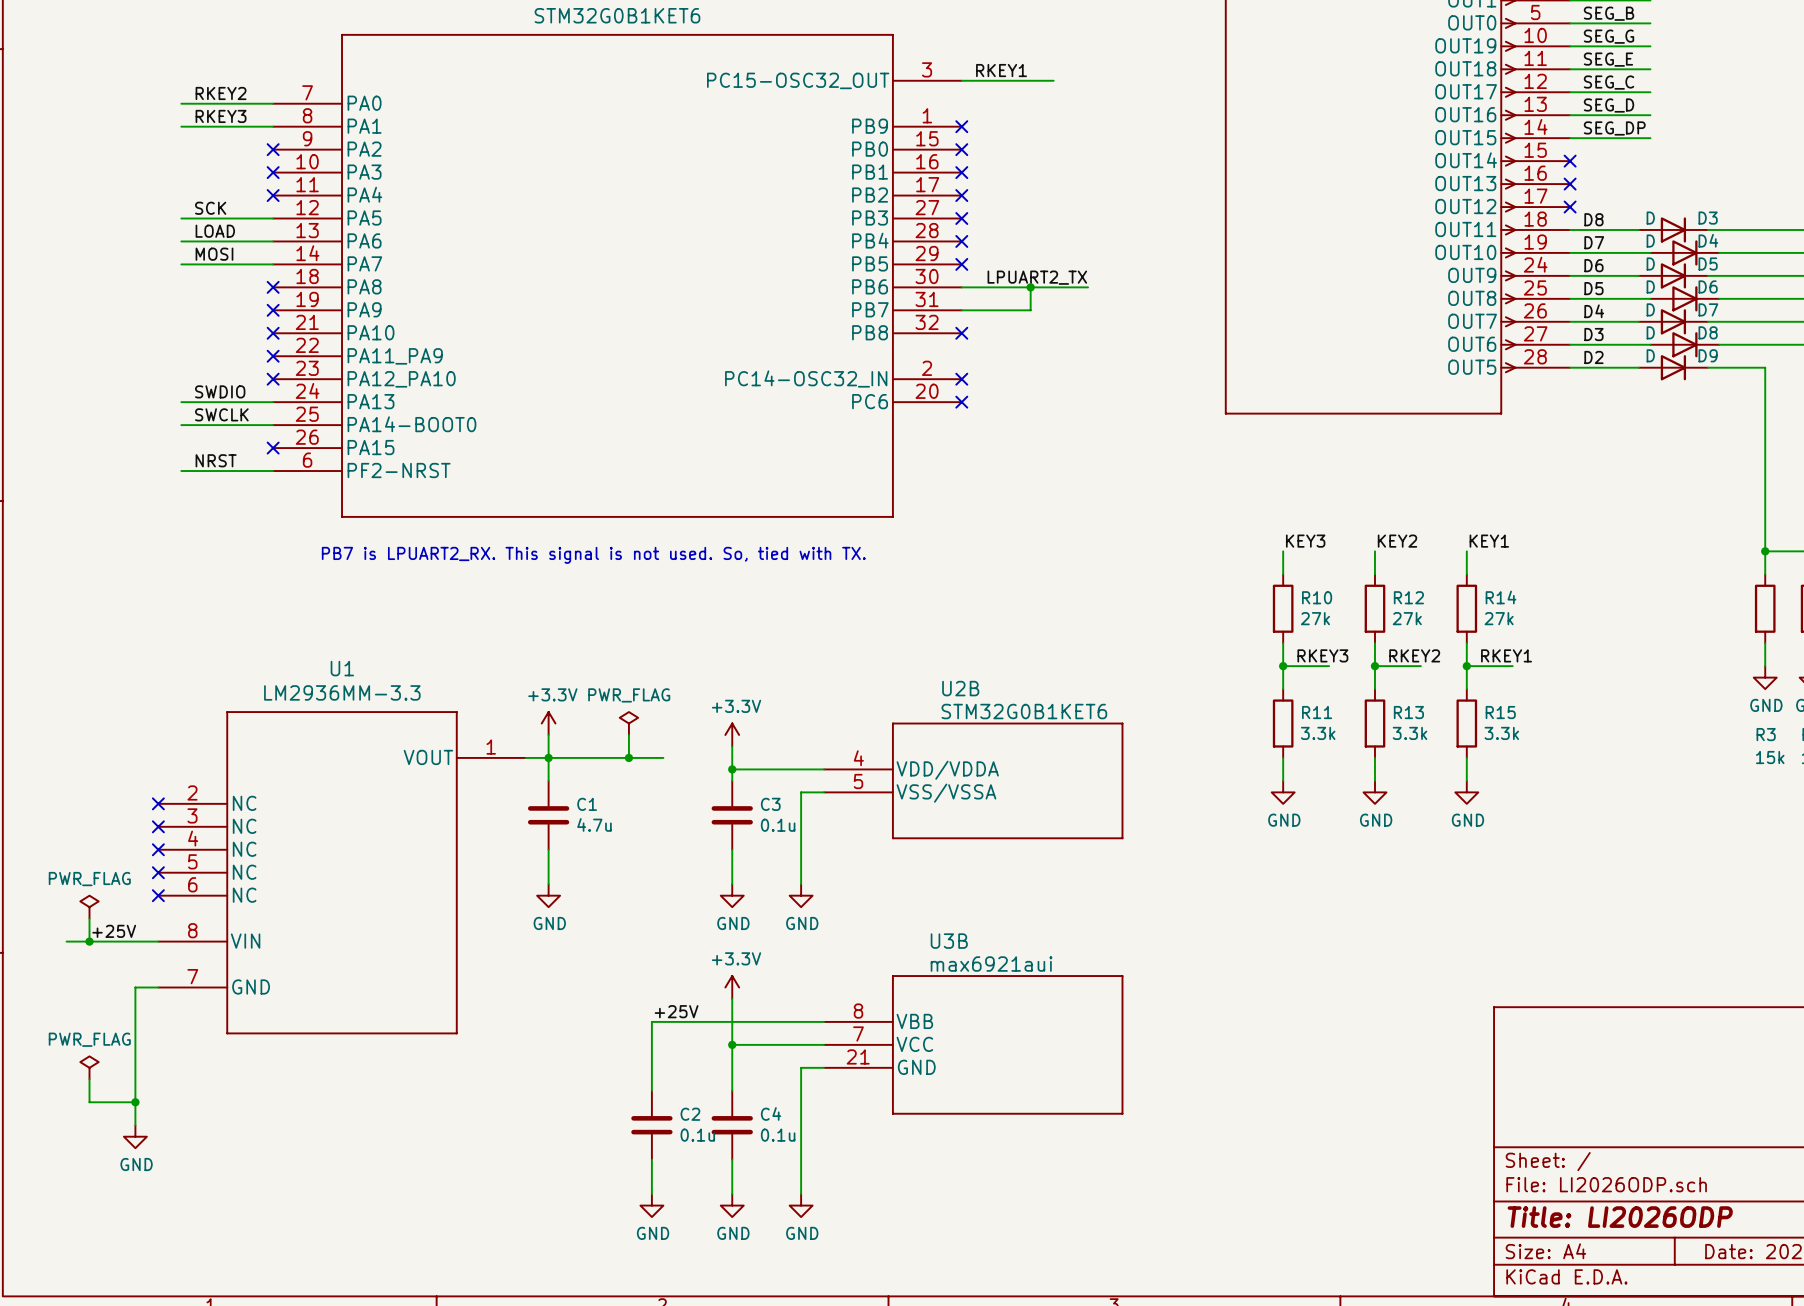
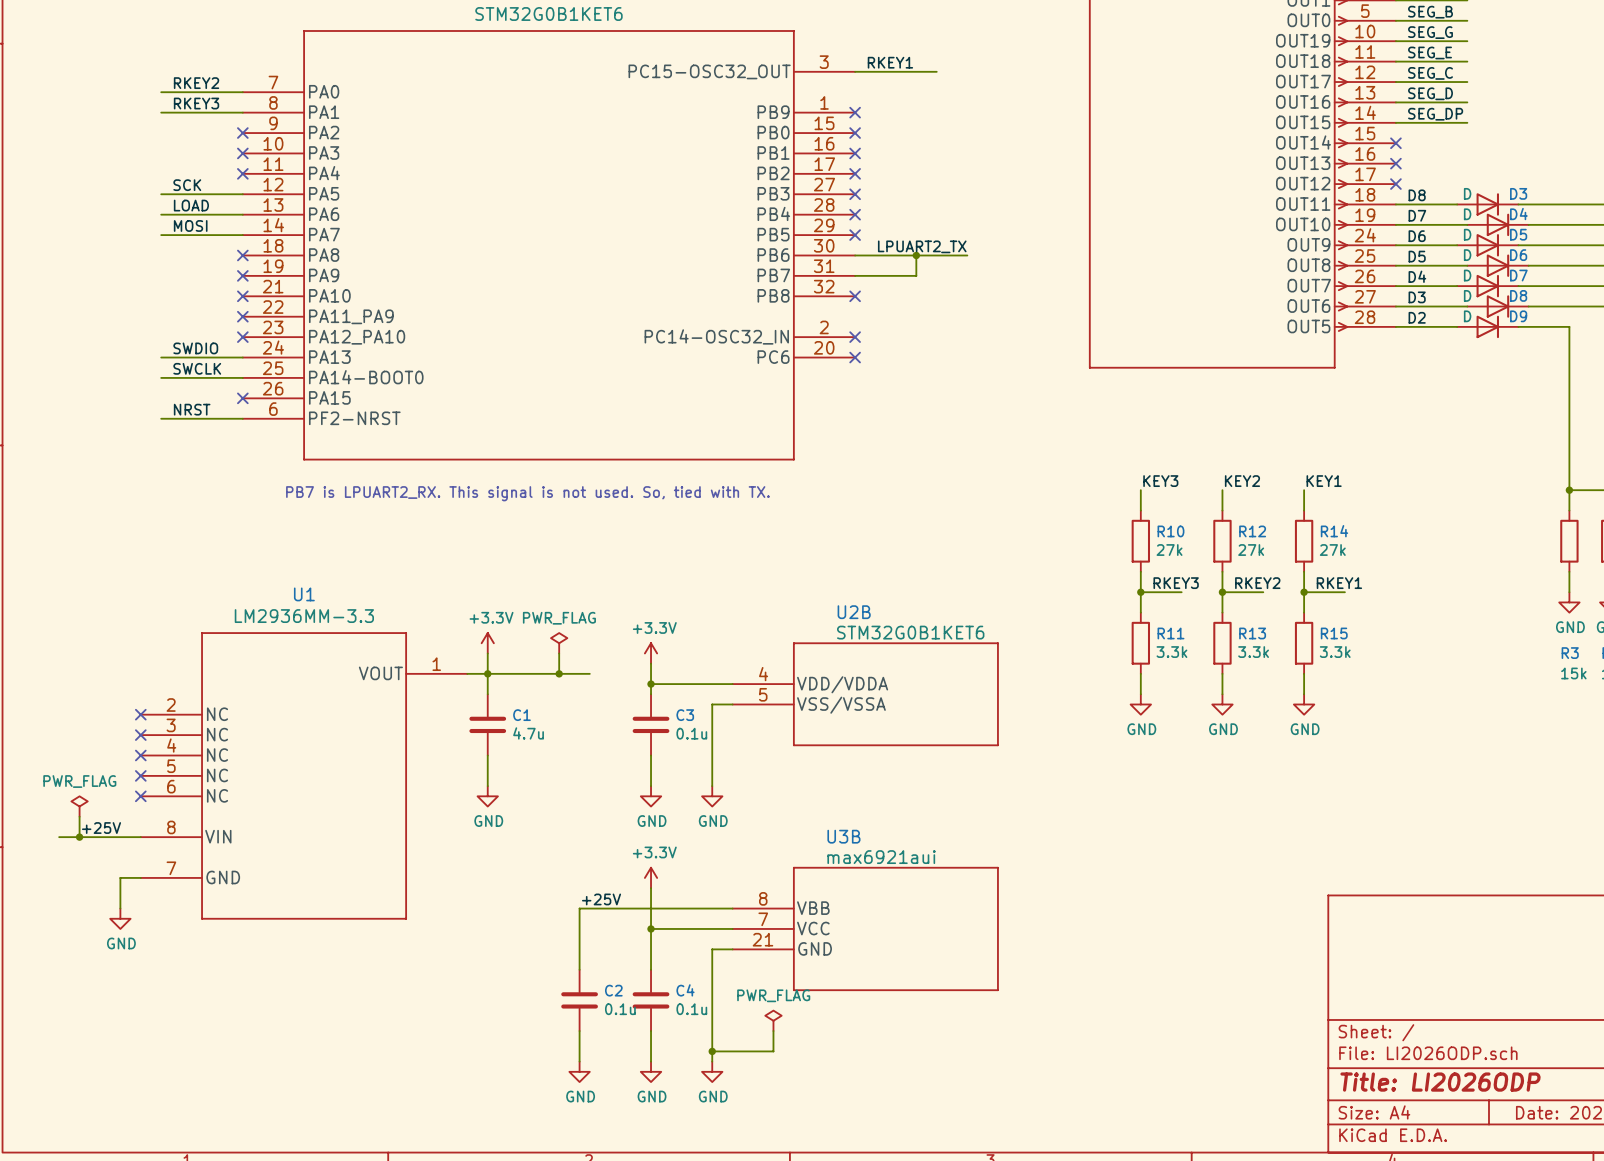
wire: (135, 1021) (135, 1125) -> none
power symbol: PWR_FLAG (89, 1067) -> none
wire: (89, 1079) (89, 1102) (135, 1102) -> none
junction: (135, 1102) -> none
power symbol position: GND (135, 1136) -> GND (120, 918)
power symbol: none -> PWR_FLAG (773, 1020)
wire: none -> (773, 1031) (773, 1051) (712, 1051)
junction: none -> (712, 1051)

